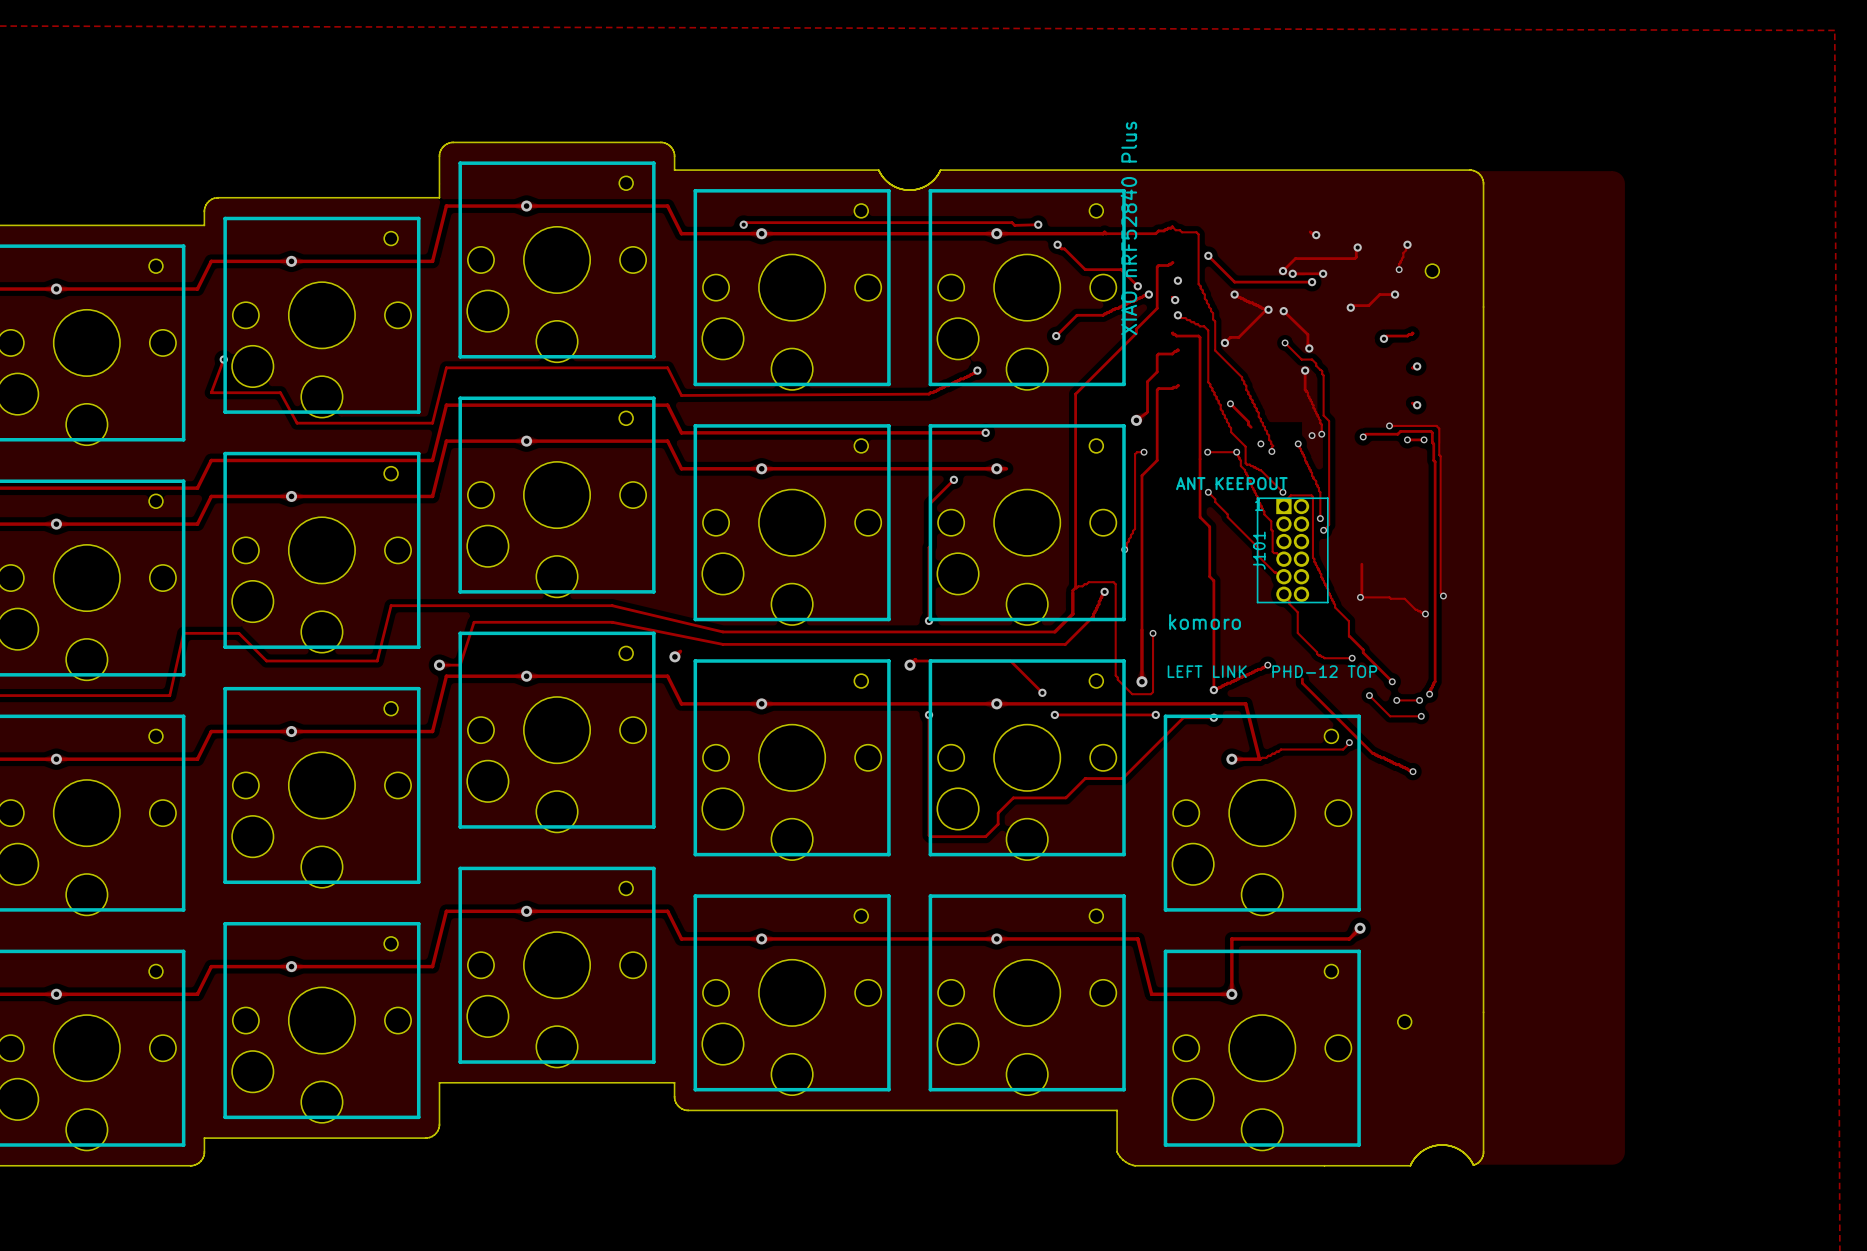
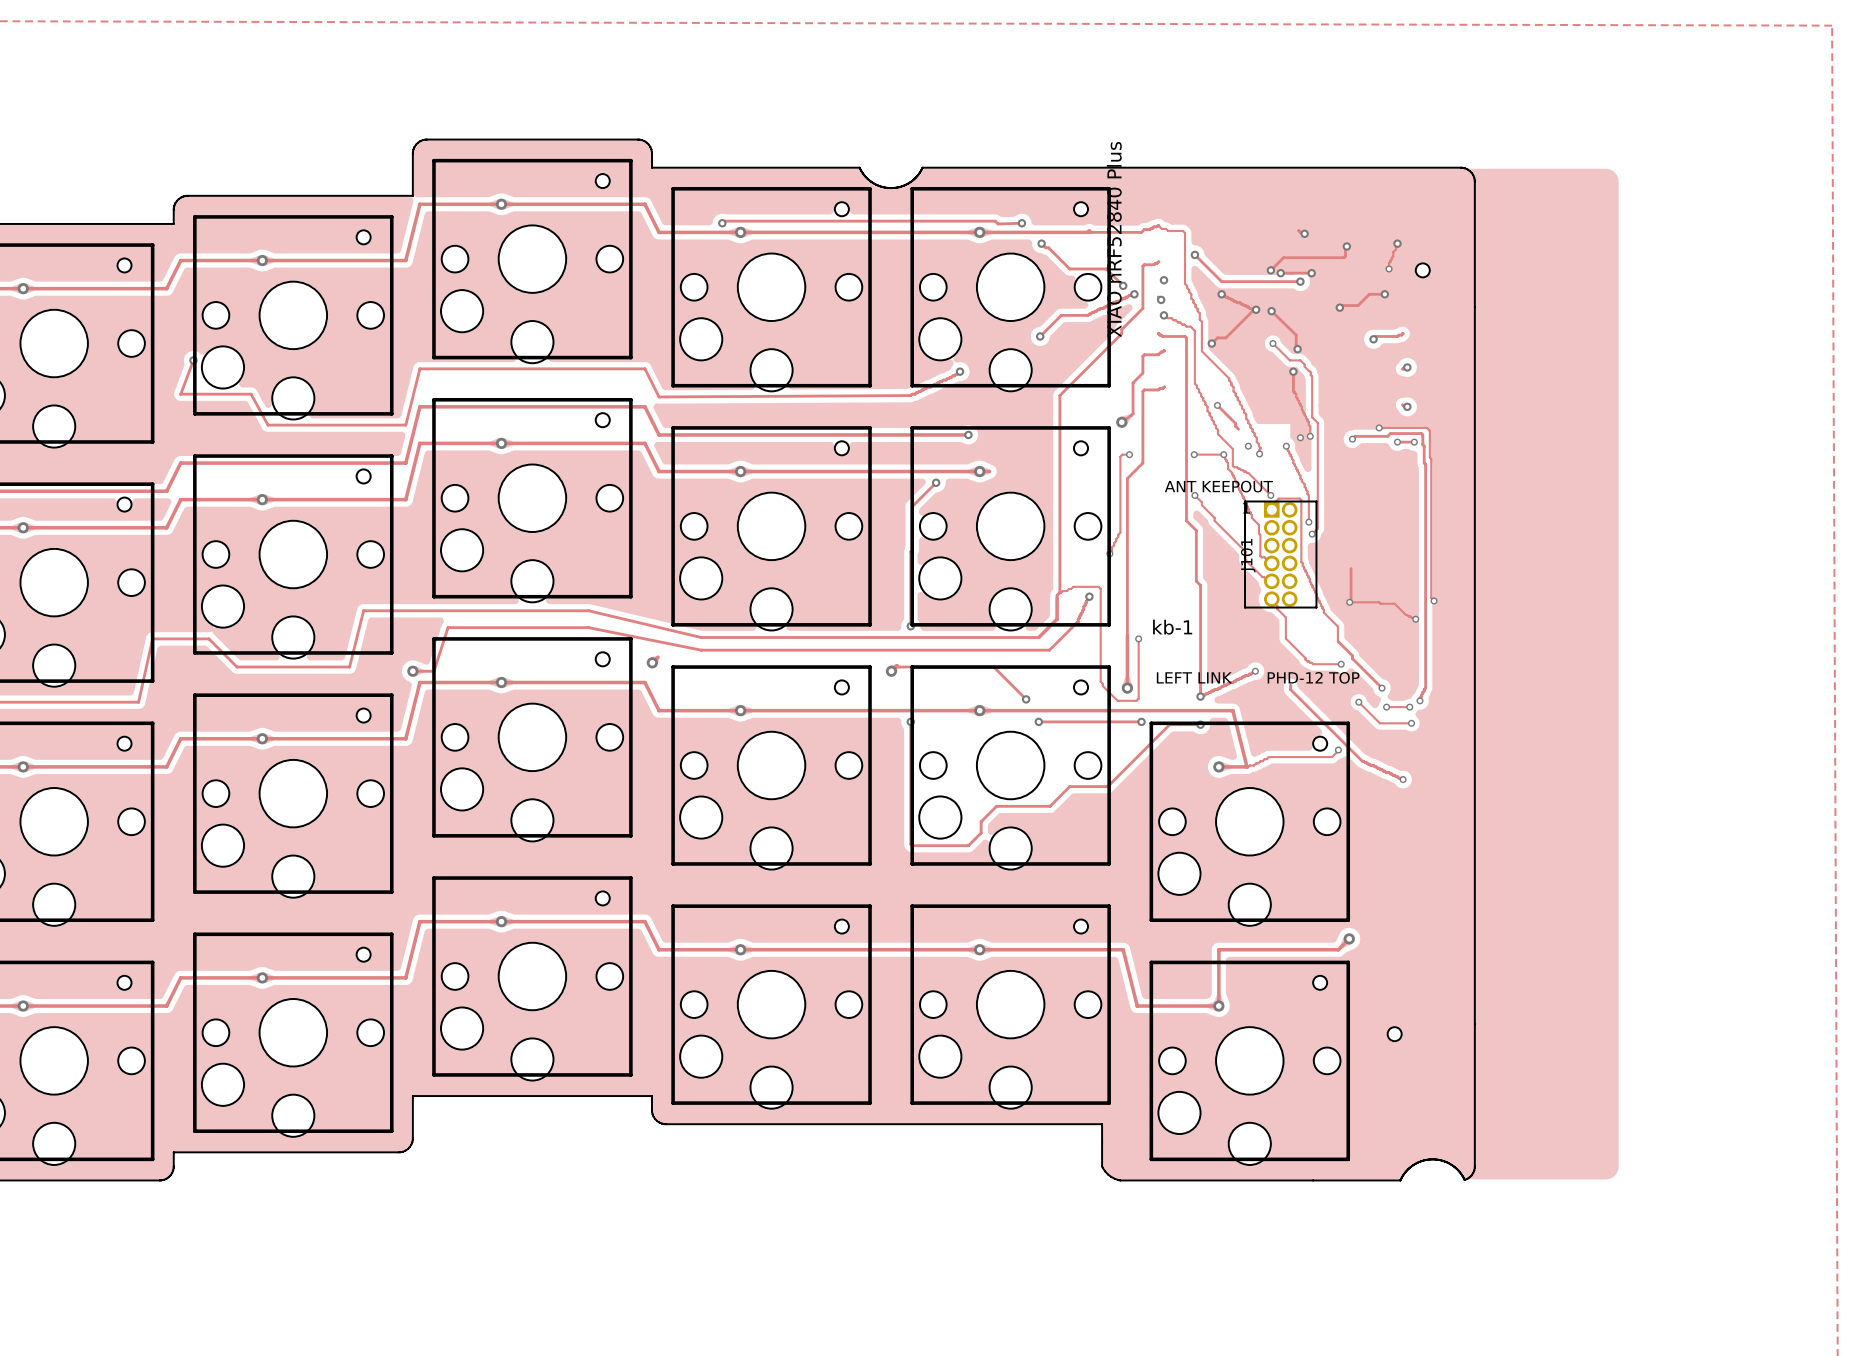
text: komoro (1205, 621) -> kb-1 (1172, 627)

